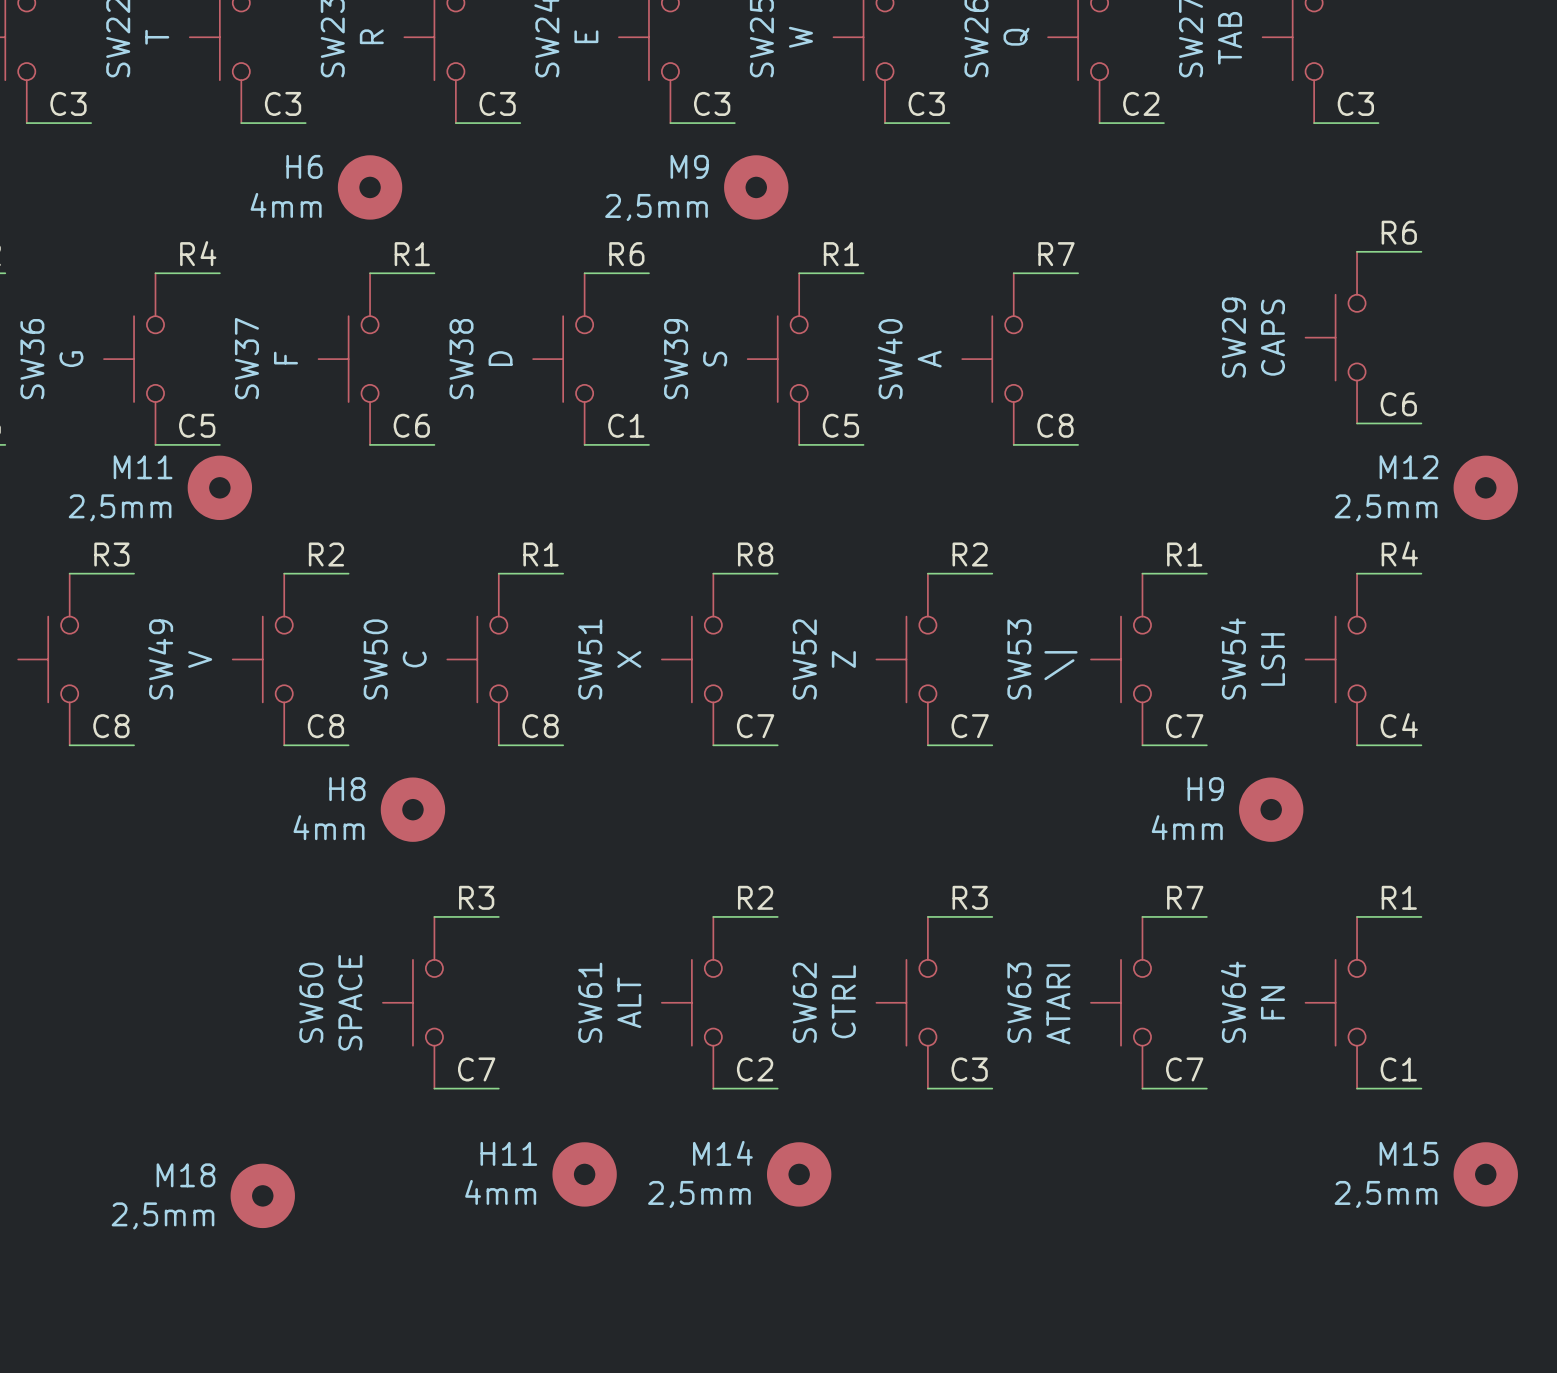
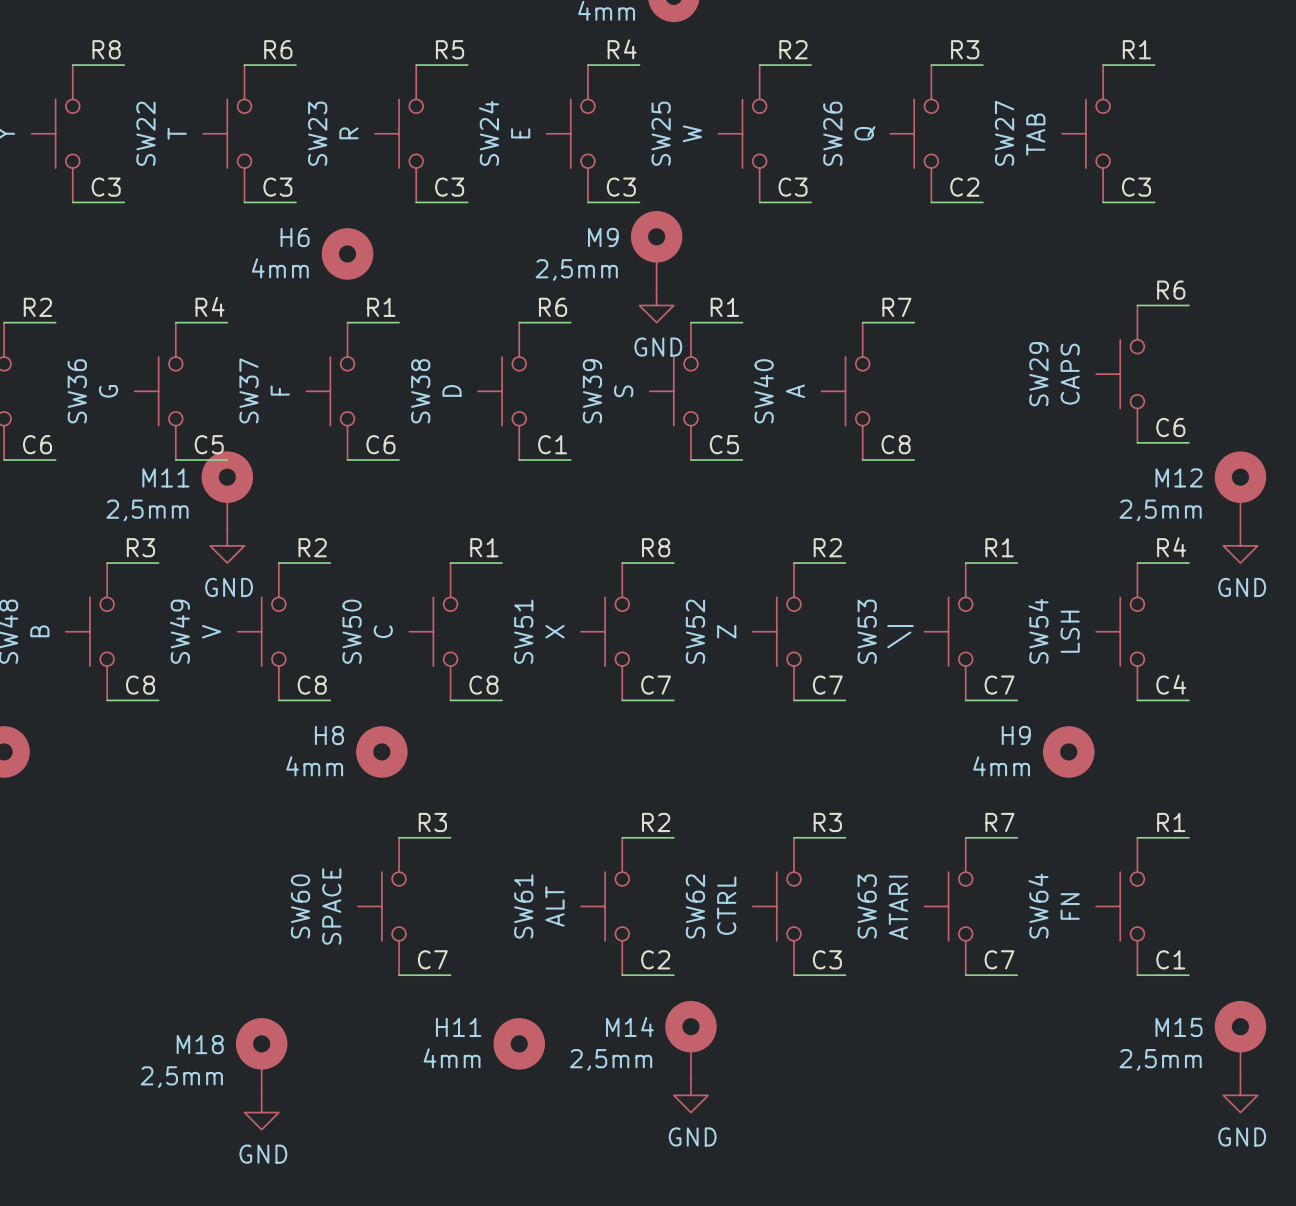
M9 symbol: [724, 155, 789, 220] -> [630, 211, 683, 289]
power symbol: none -> GND (656, 305)
M11 symbol: [187, 455, 253, 521] -> [201, 451, 254, 529]
M12 symbol: [1453, 455, 1518, 521] -> [1214, 451, 1267, 529]
power symbol: none -> GND (227, 545)
power symbol: none -> GND (1240, 545)
M14 symbol: [766, 1142, 832, 1207] -> [665, 1000, 717, 1079]
M15 symbol: [1453, 1142, 1518, 1207] -> [1214, 1000, 1267, 1079]
M18 symbol: [230, 1163, 295, 1229] -> [235, 1018, 288, 1096]
power symbol: none -> GND (690, 1095)
power symbol: none -> GND (1240, 1095)
power symbol: none -> GND (261, 1112)

